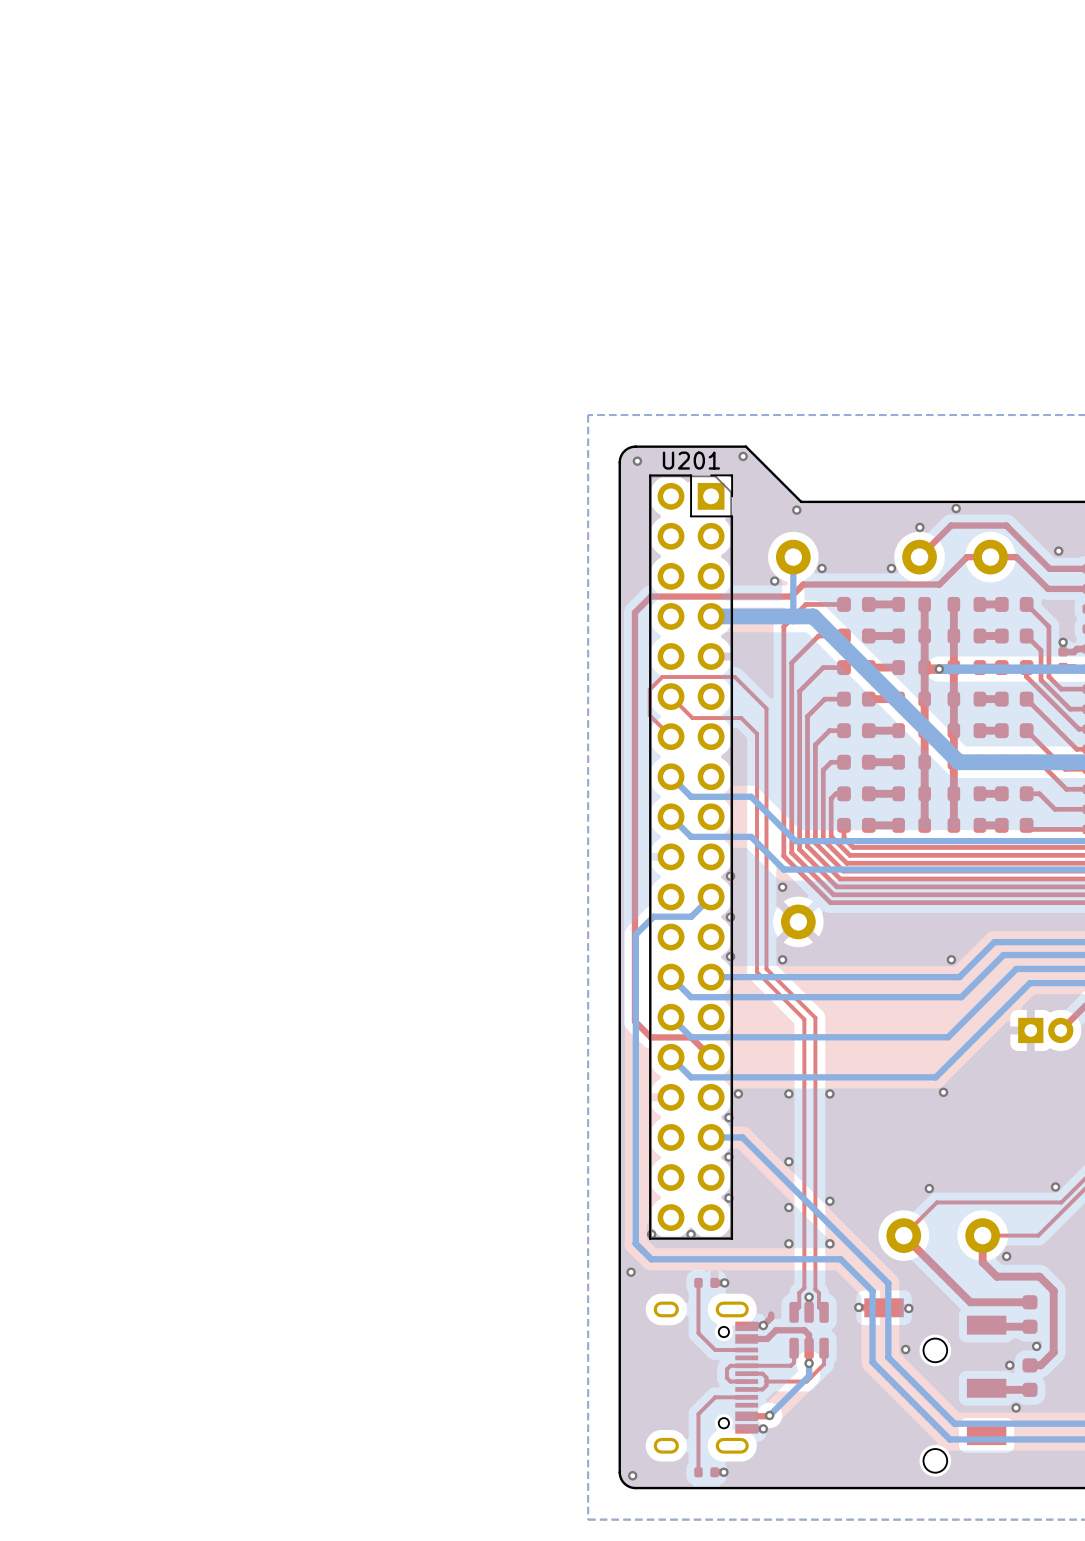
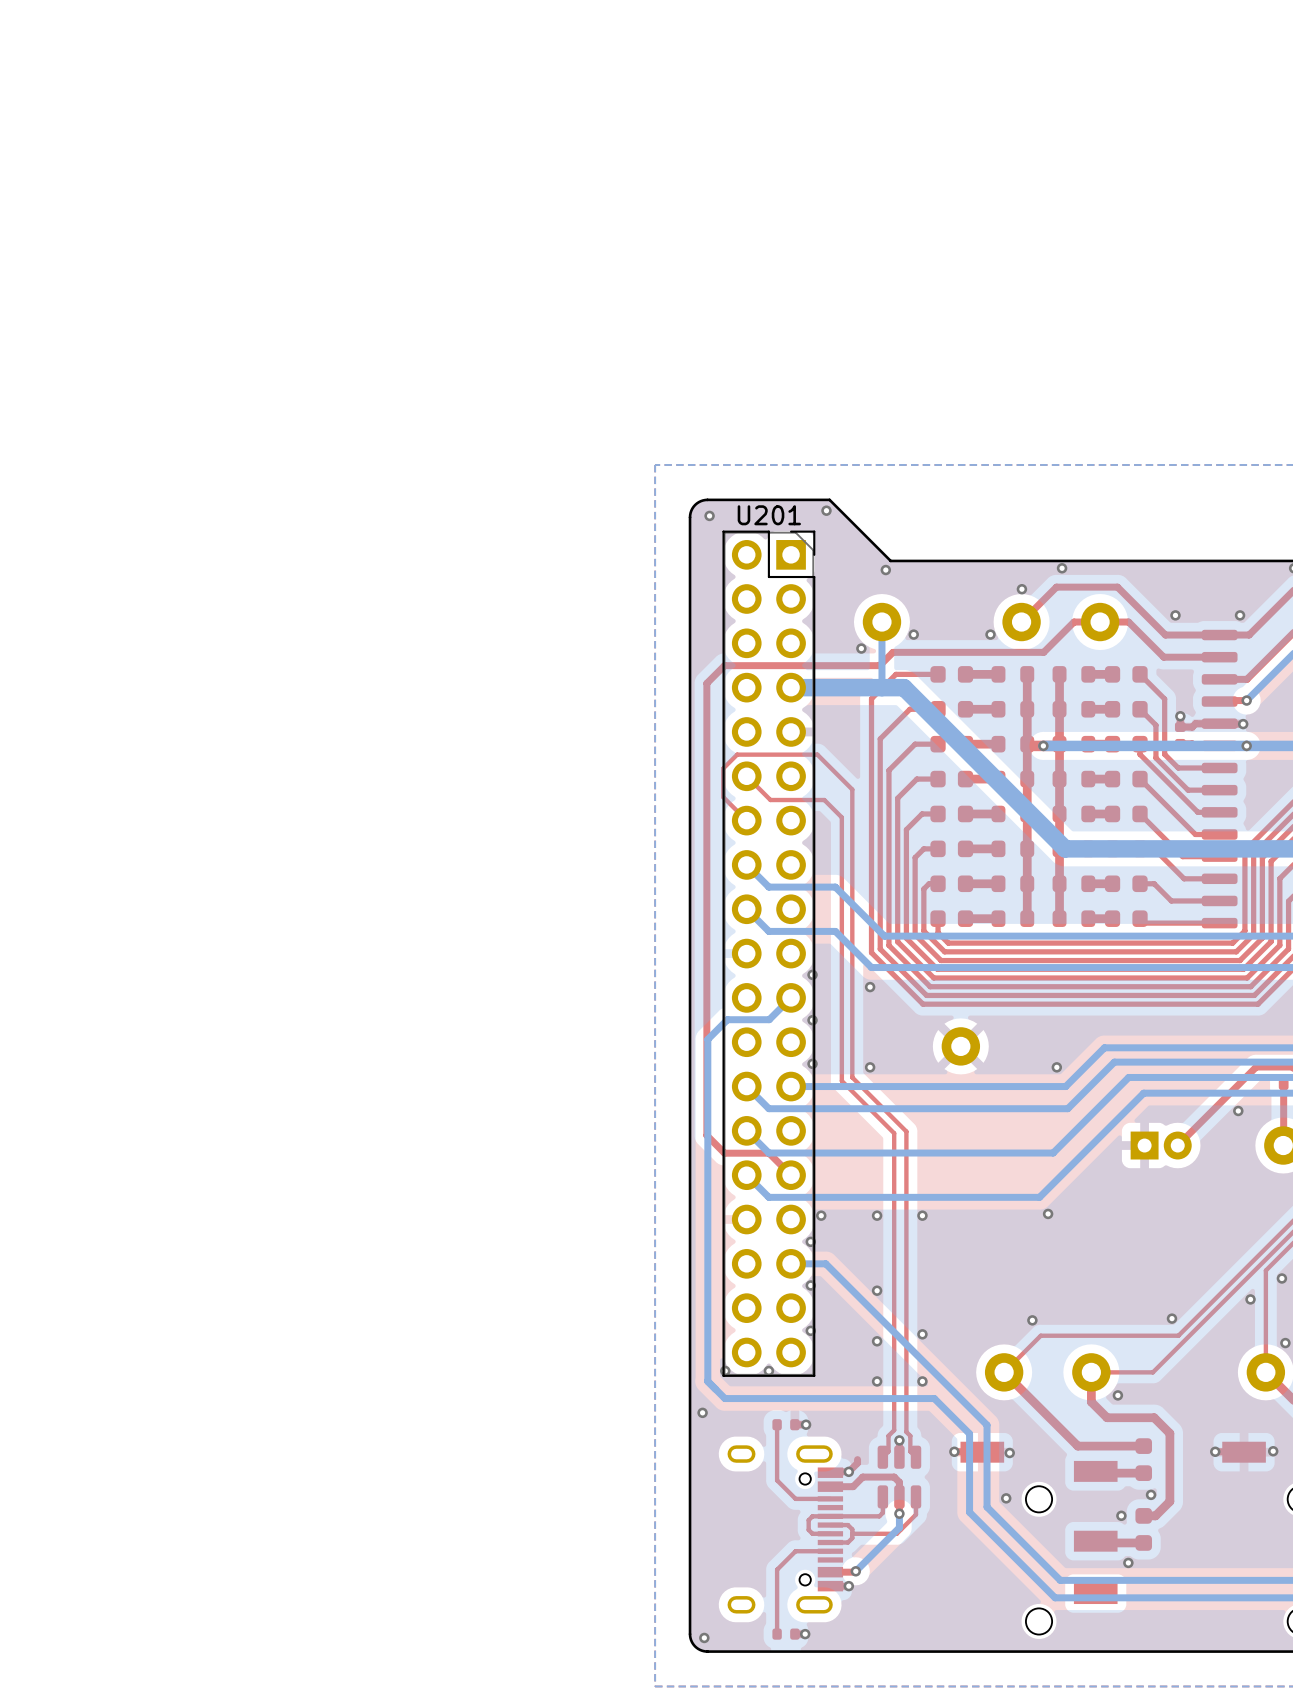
part position: (798, 921) -> (960, 1046)

